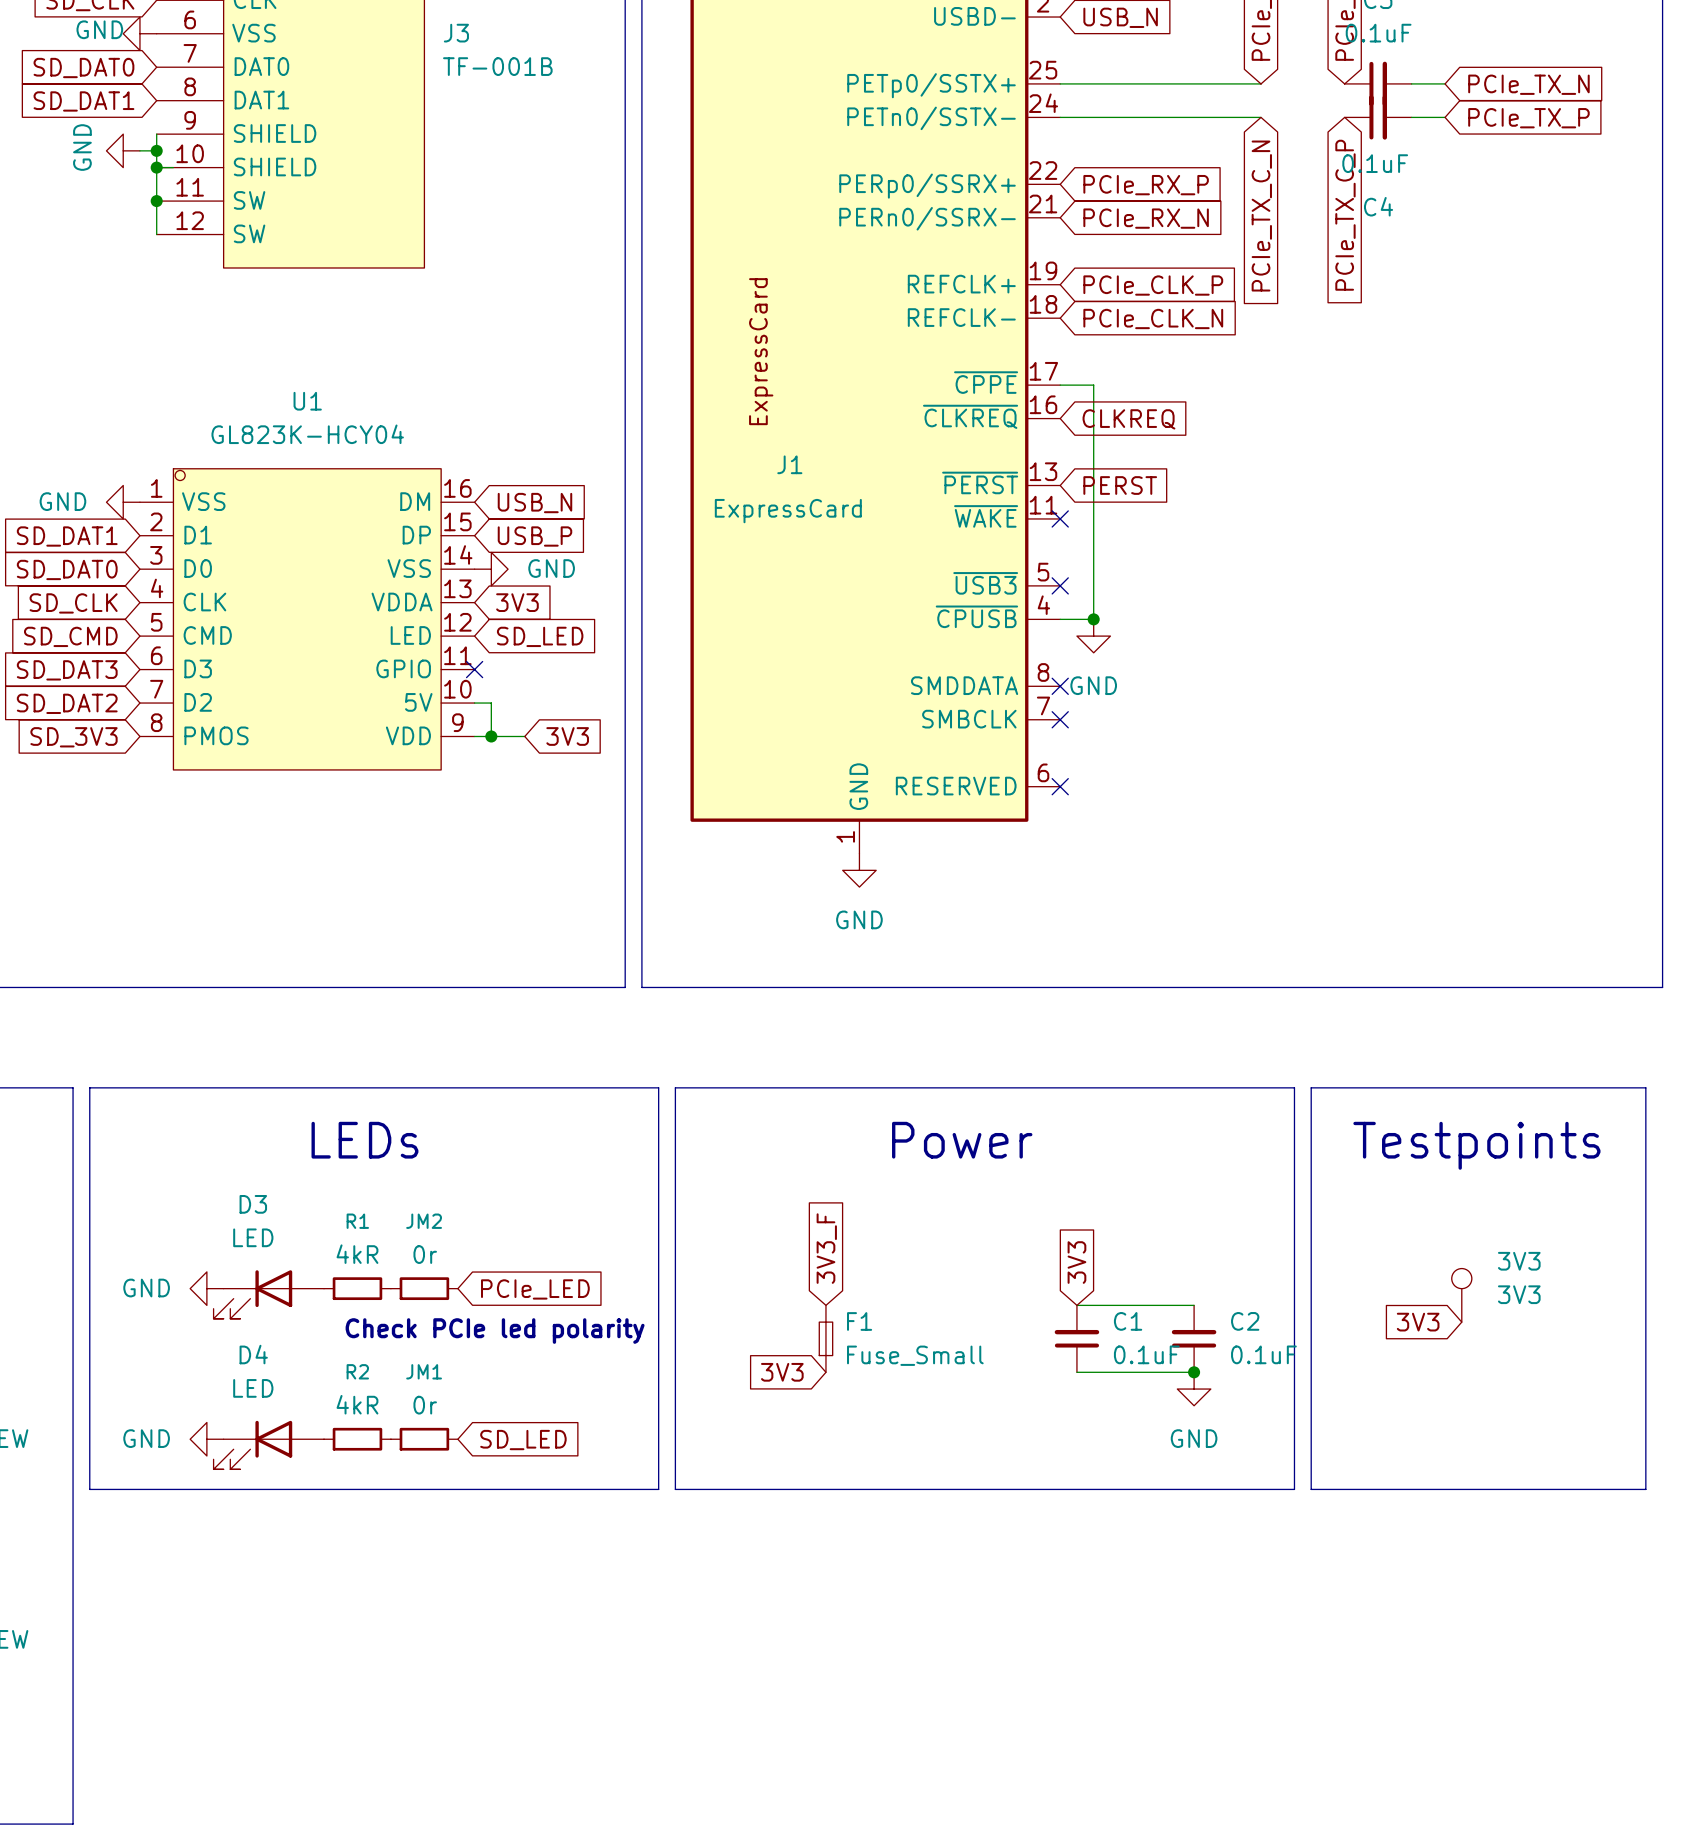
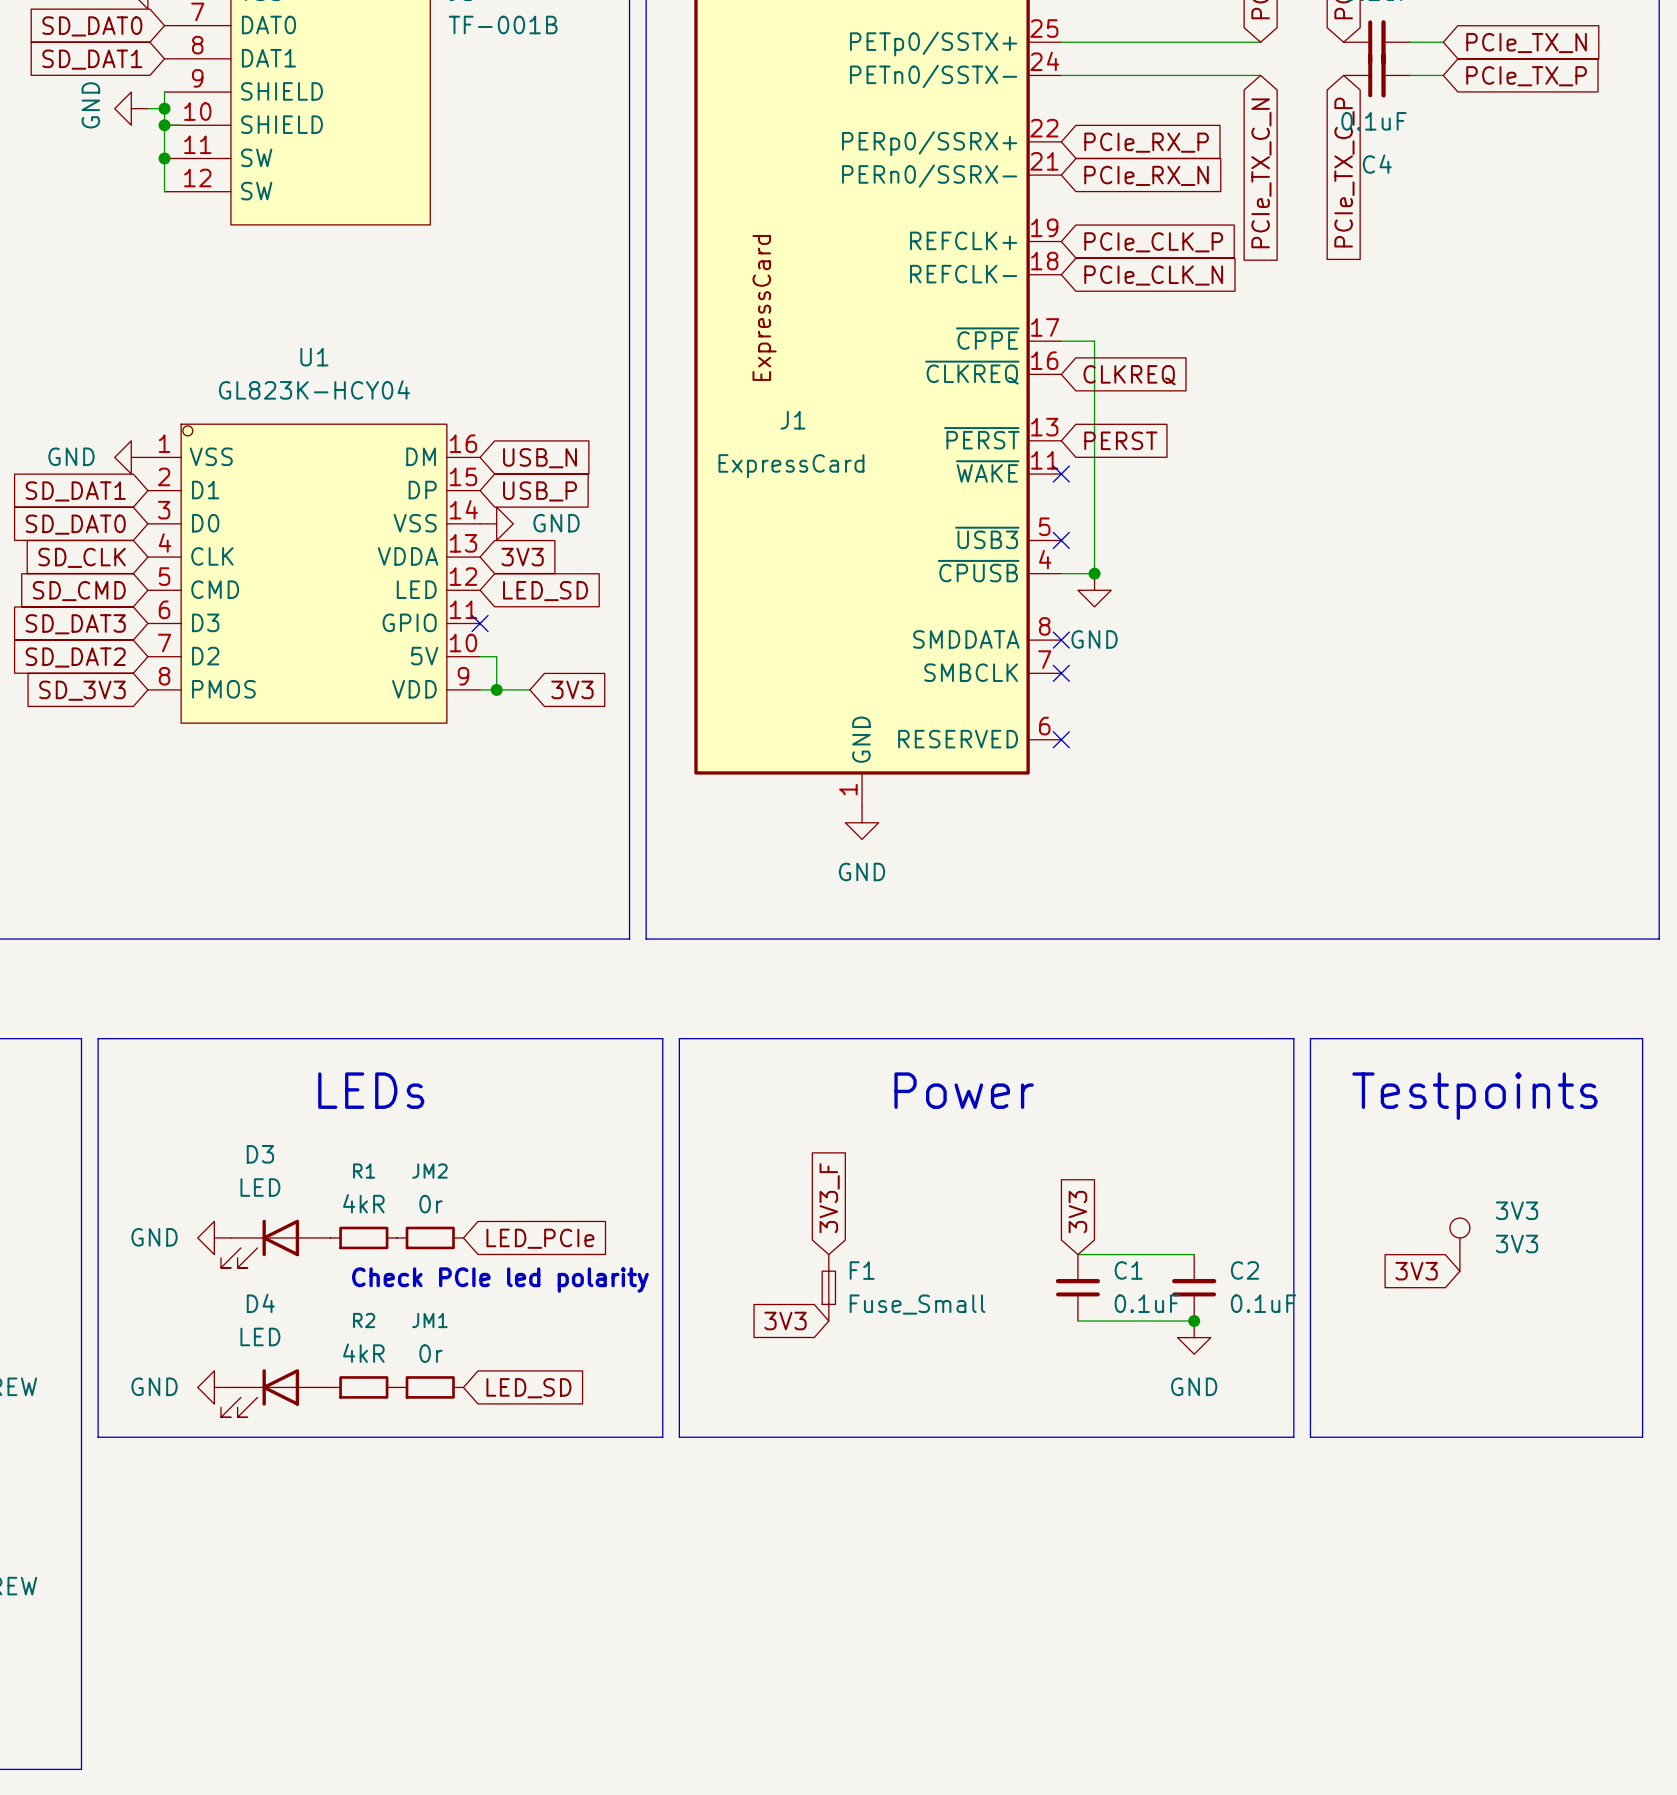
global label: SD_LED (540, 636) -> LED_SD (545, 591)
global label: PCIe_LED (535, 1289) -> LED_PCIe (540, 1238)
global label: SD_LED (523, 1440) -> LED_SD (528, 1388)

